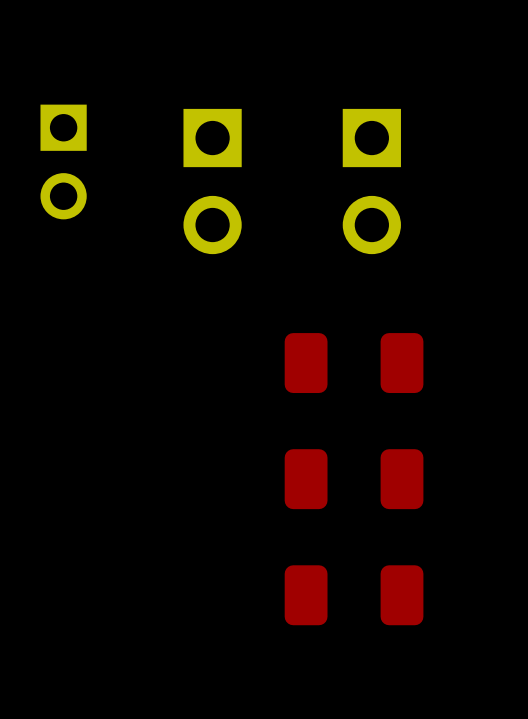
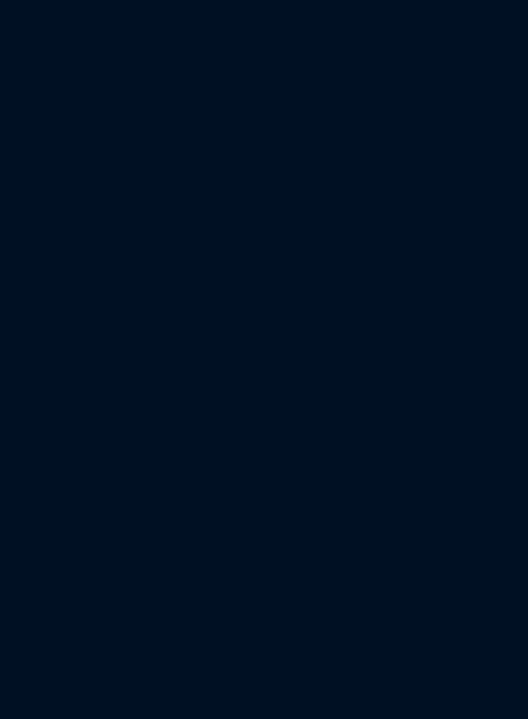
part: (63, 161) -> none
part: (212, 181) -> none
part: (371, 181) -> none
part: (354, 363) -> none
part: (354, 479) -> none
part: (354, 595) -> none

